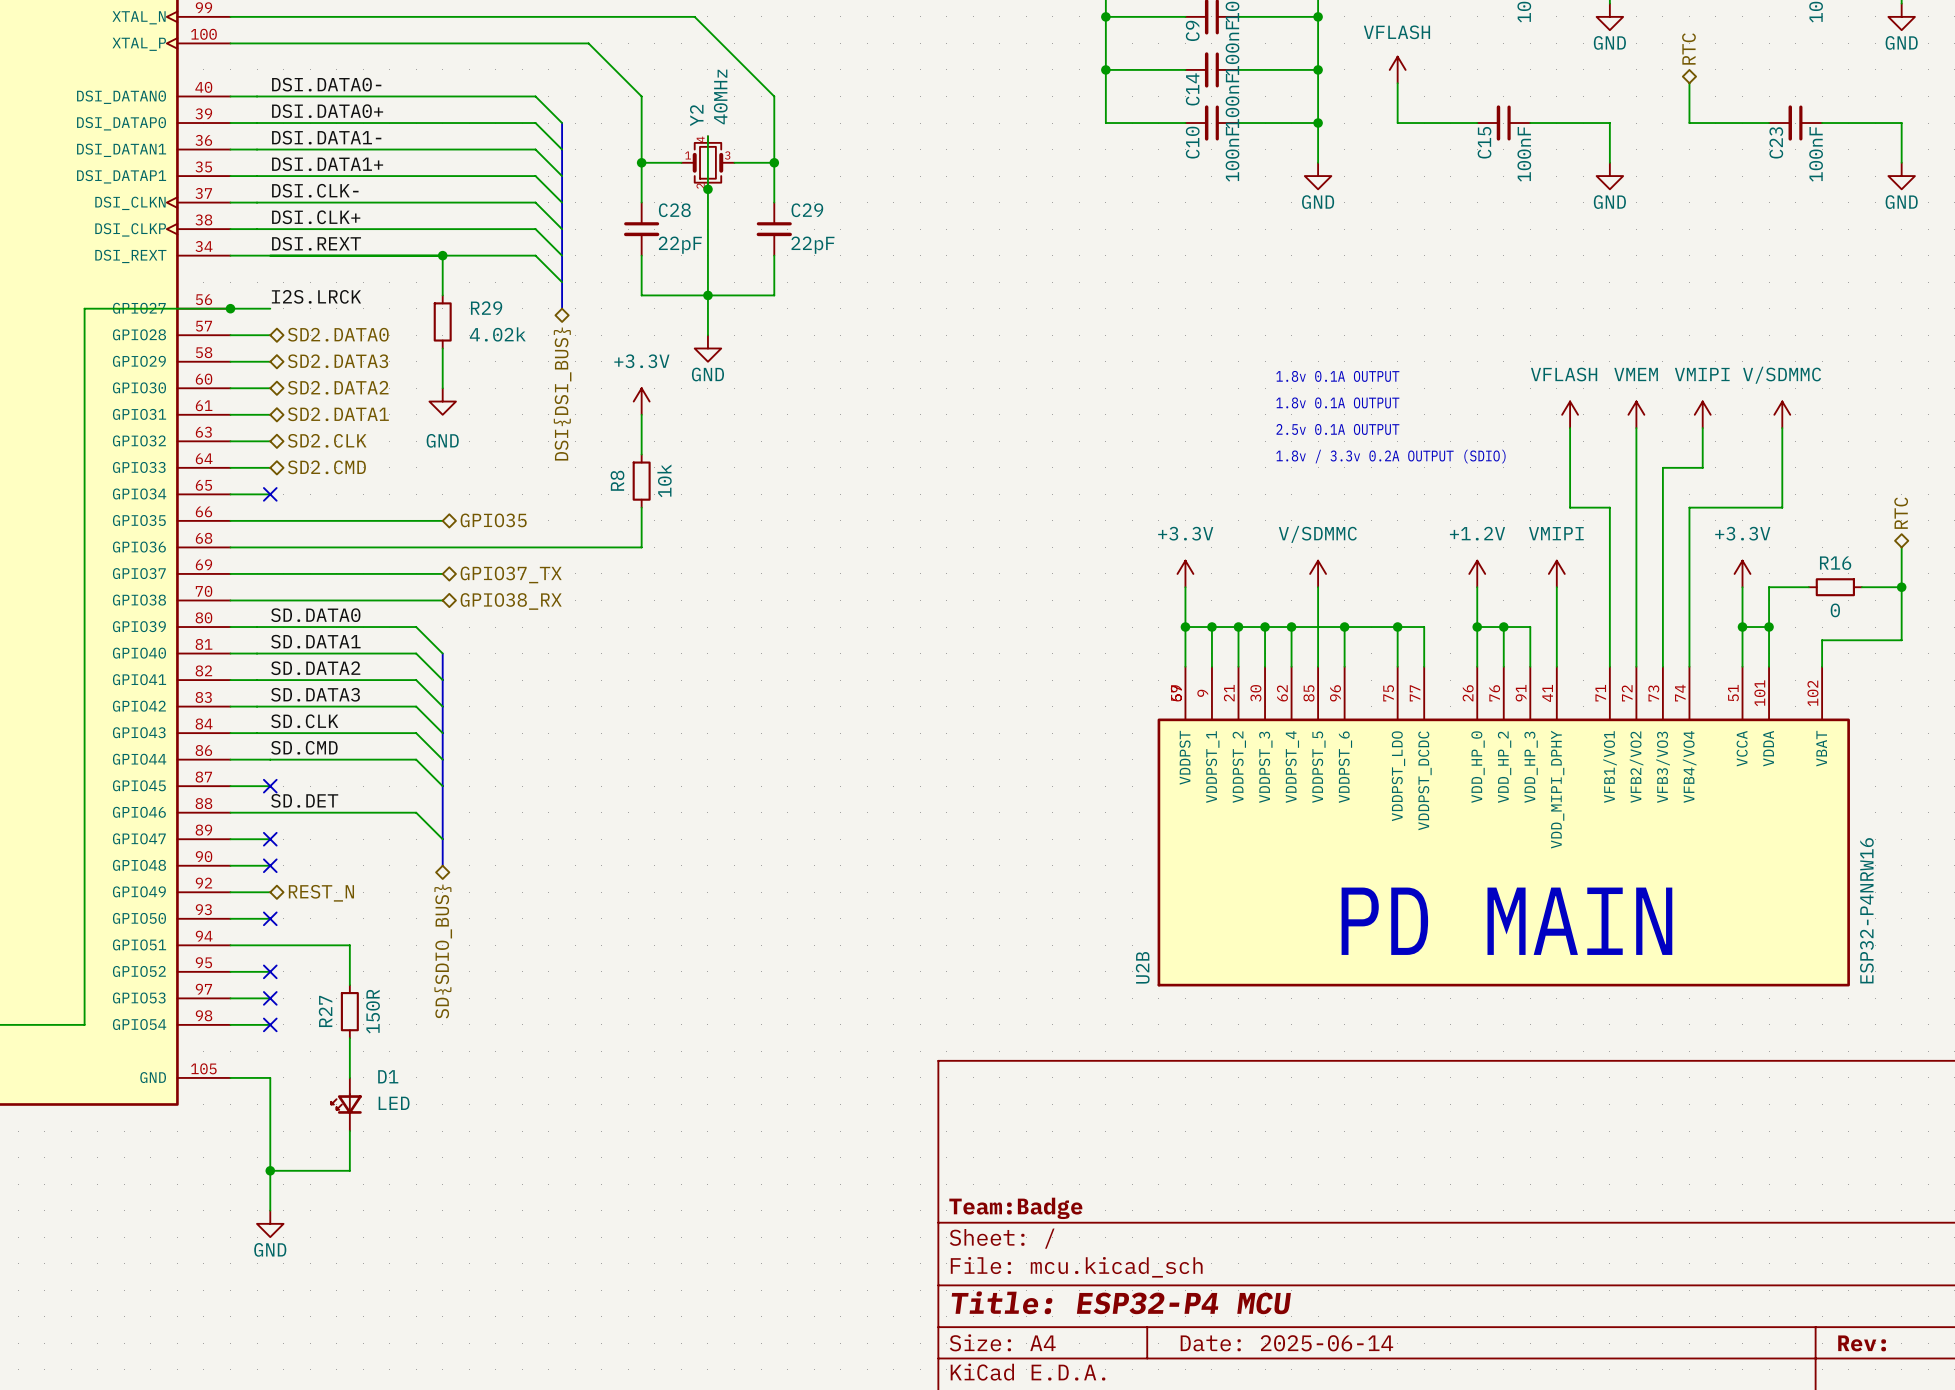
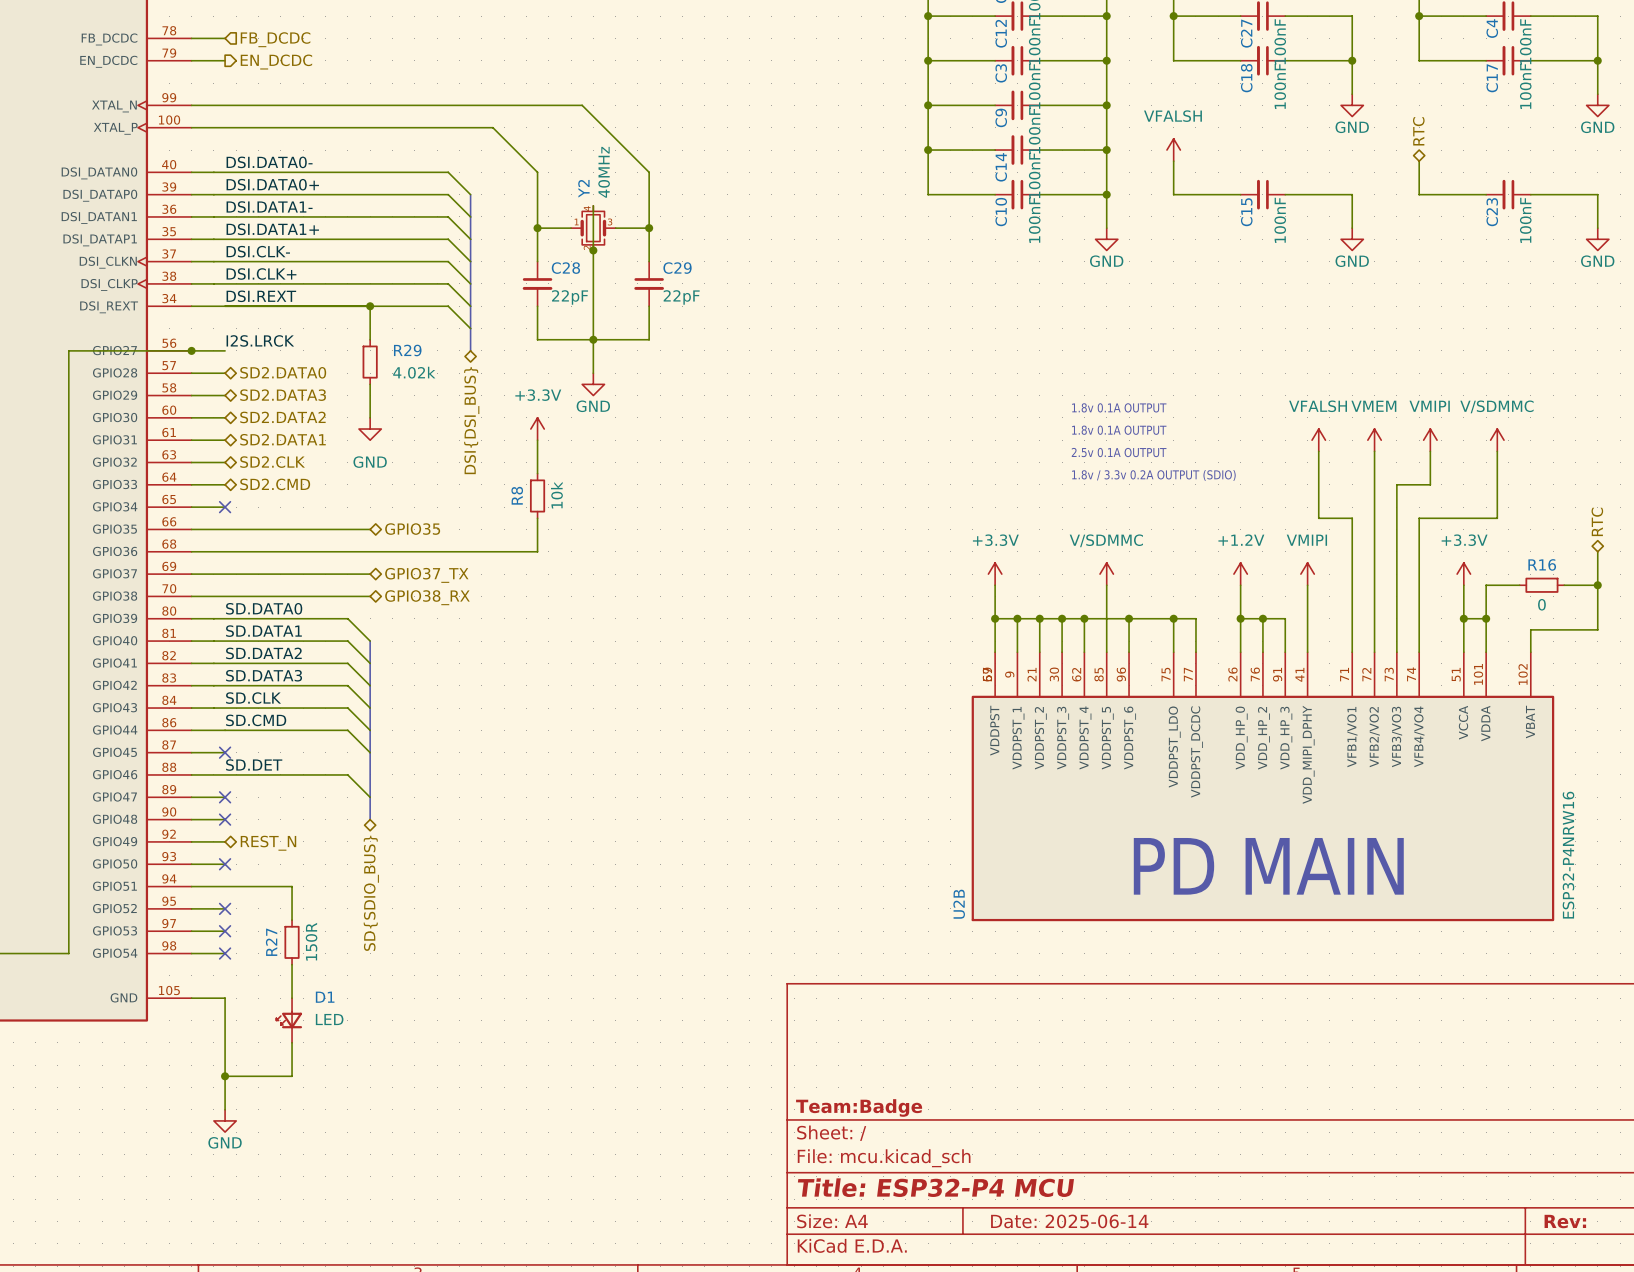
power symbol: VFLASH (1397, 69) -> VFALSH (1173, 150)
power symbol: VFLASH (1570, 414) -> VFALSH (1318, 440)

